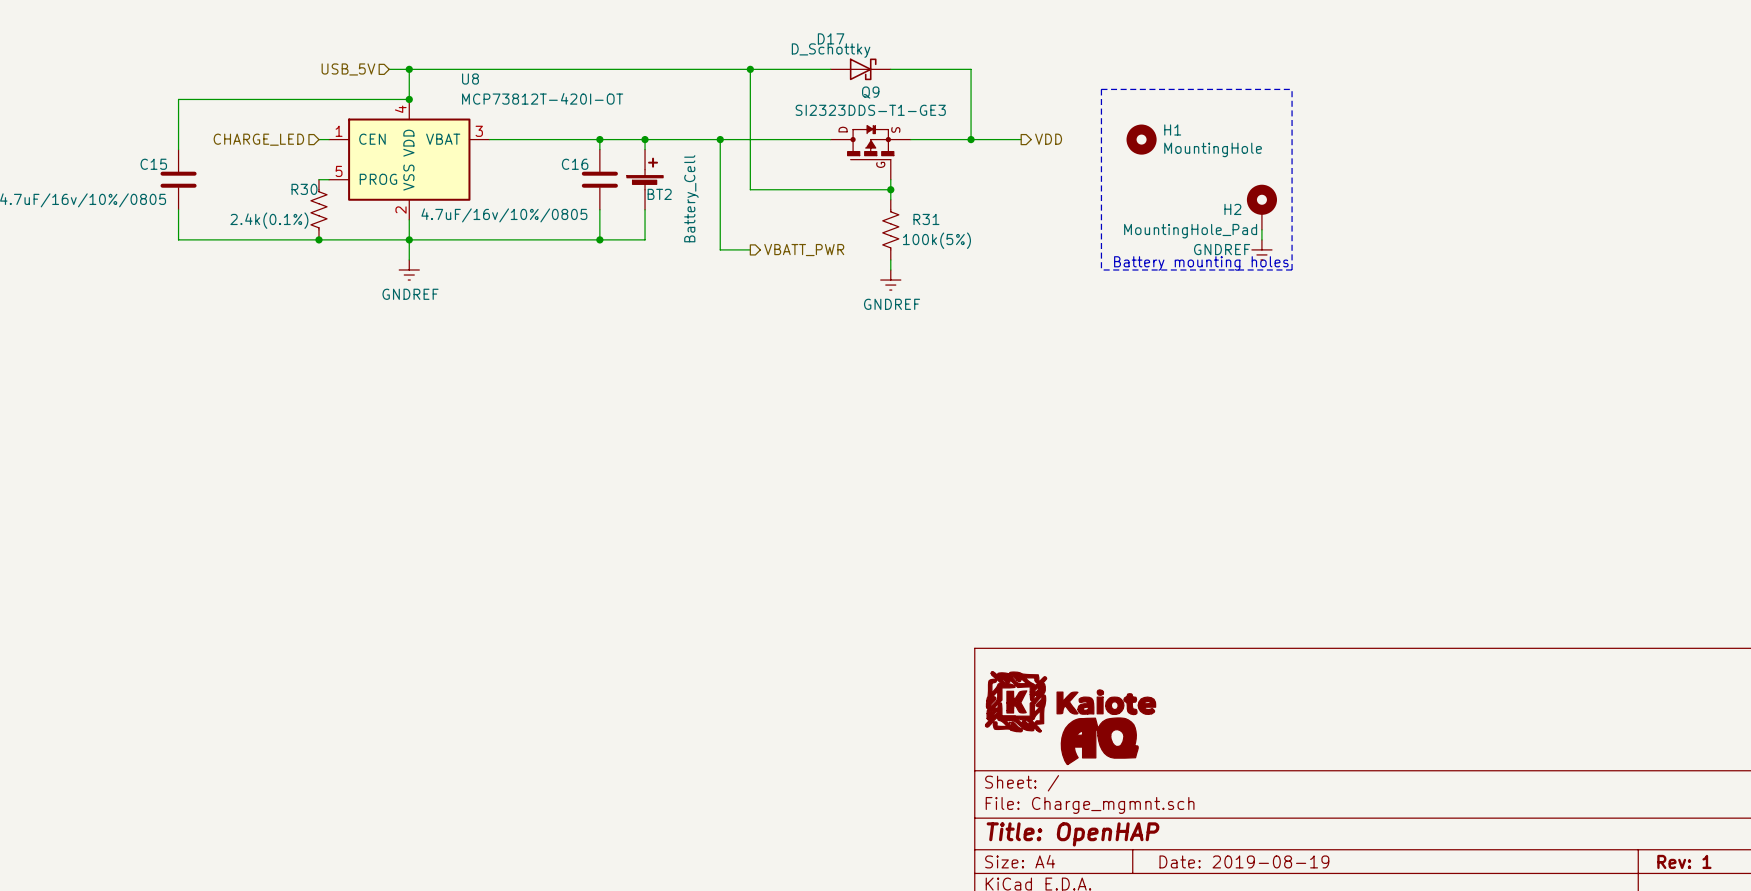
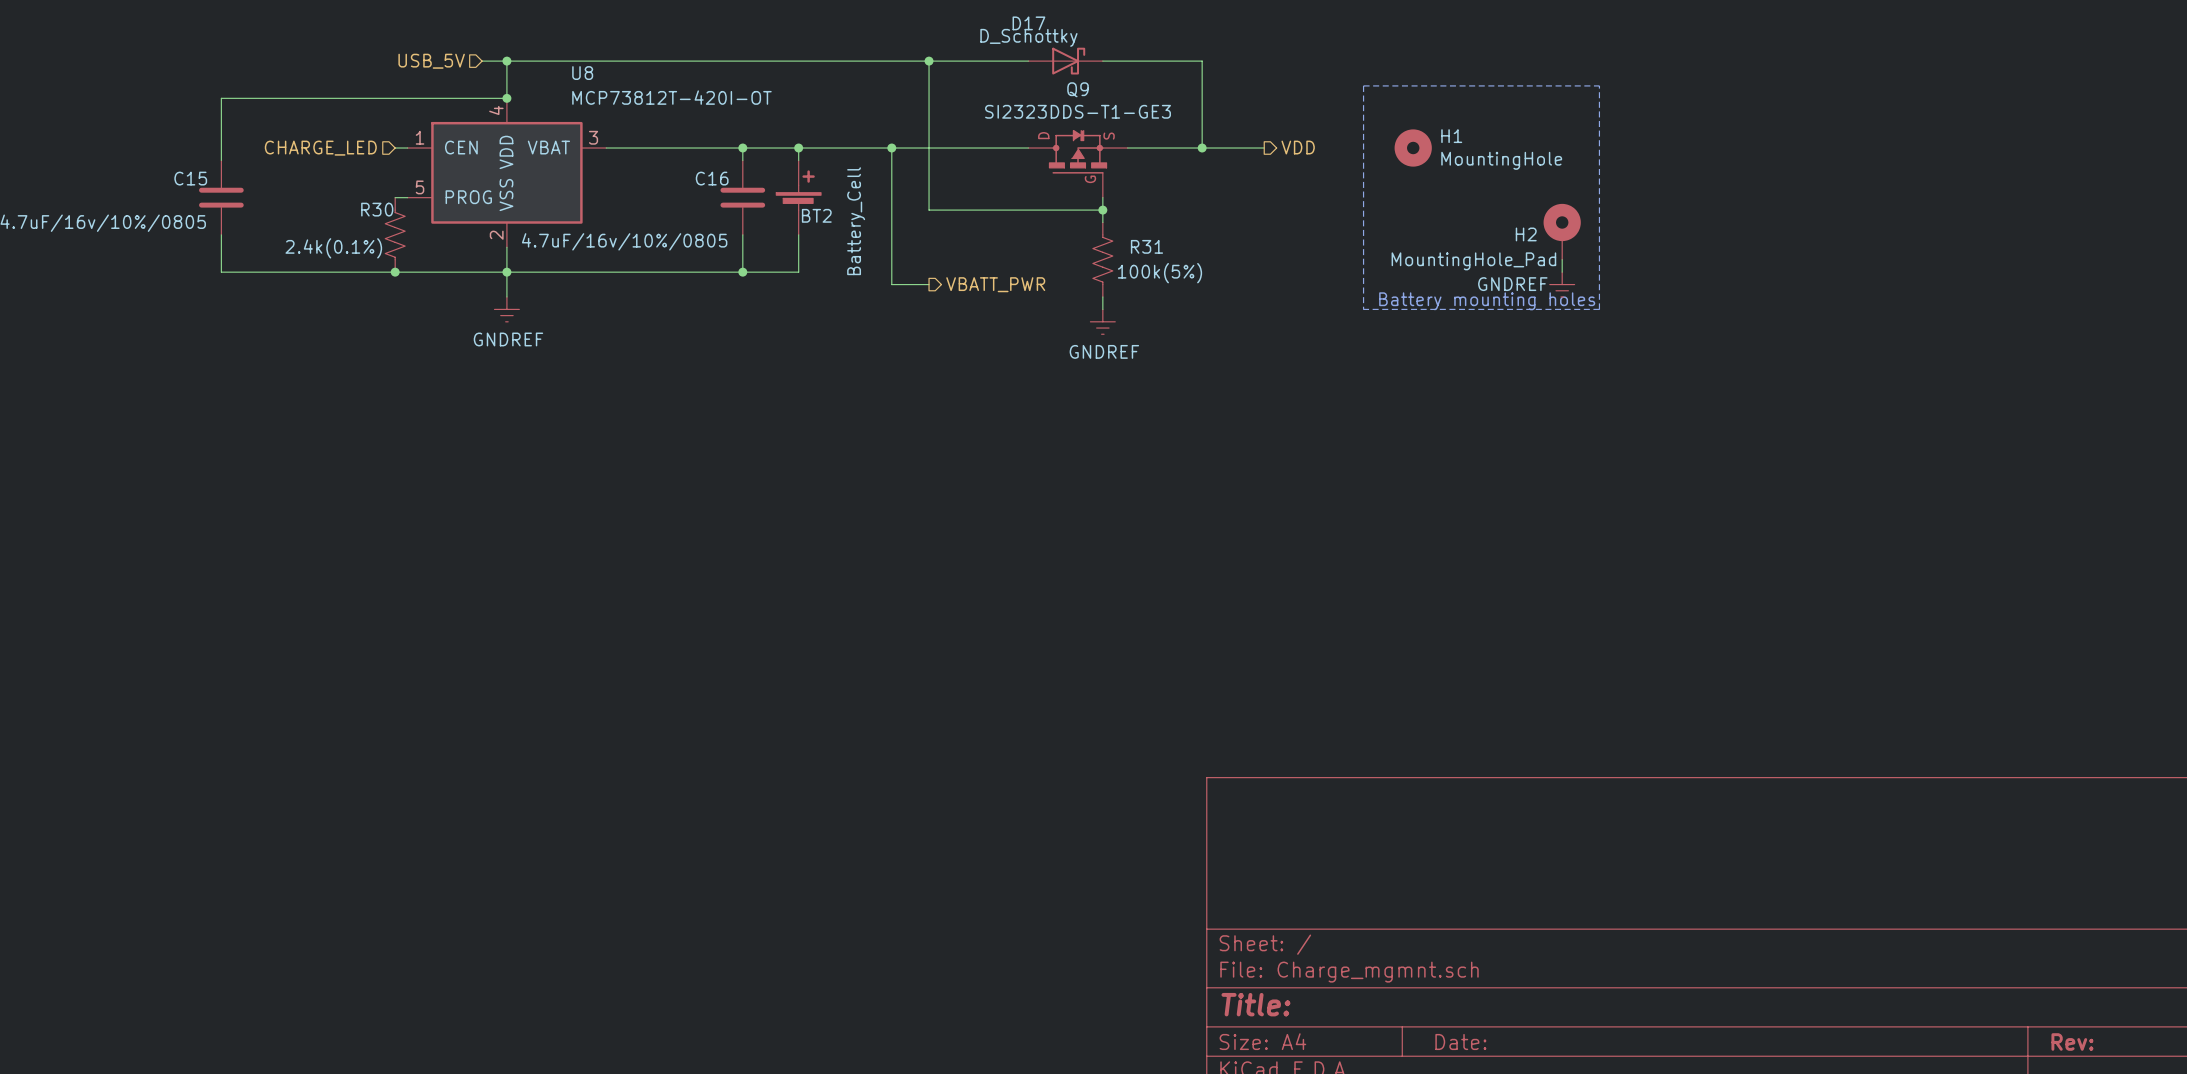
part: (1070, 701) -> none
part: (1099, 741) -> none
title block: Title: OpenHAP (1073, 834) -> Title: (1255, 1004)
title block: Date: 2019-08-19 (1244, 861) -> Date: (1460, 1041)
title block: Rev: 1 (1684, 861) -> Rev: (2072, 1041)

